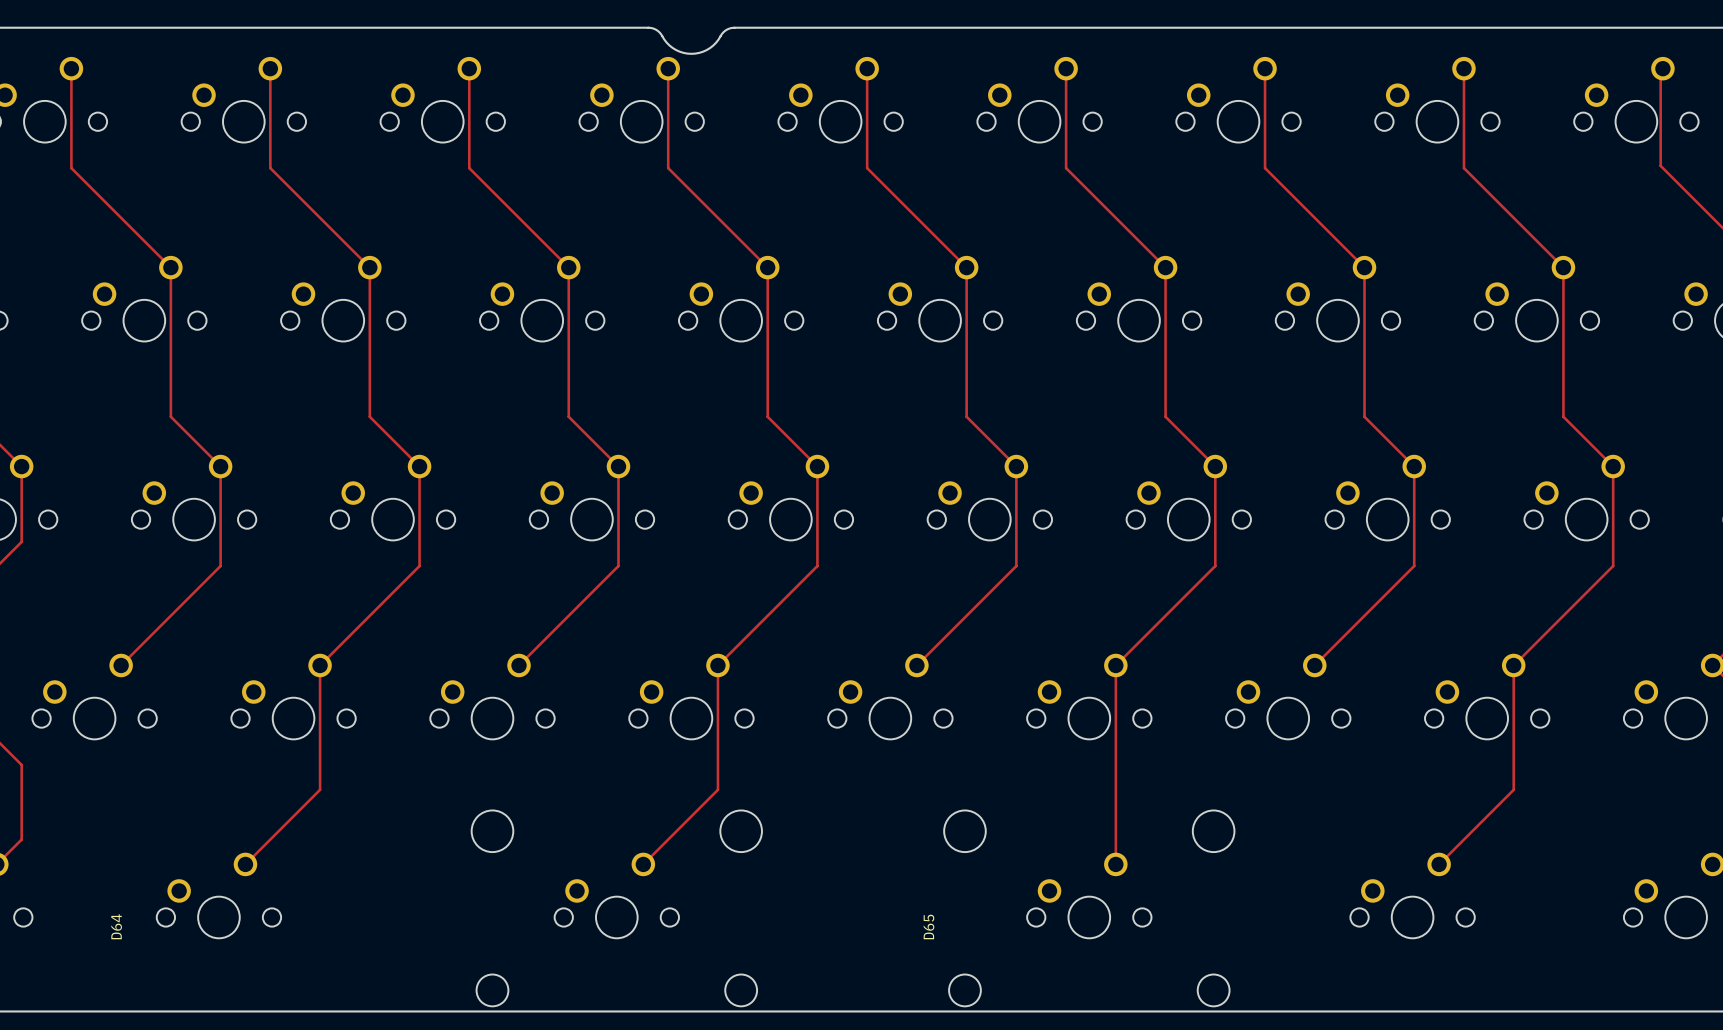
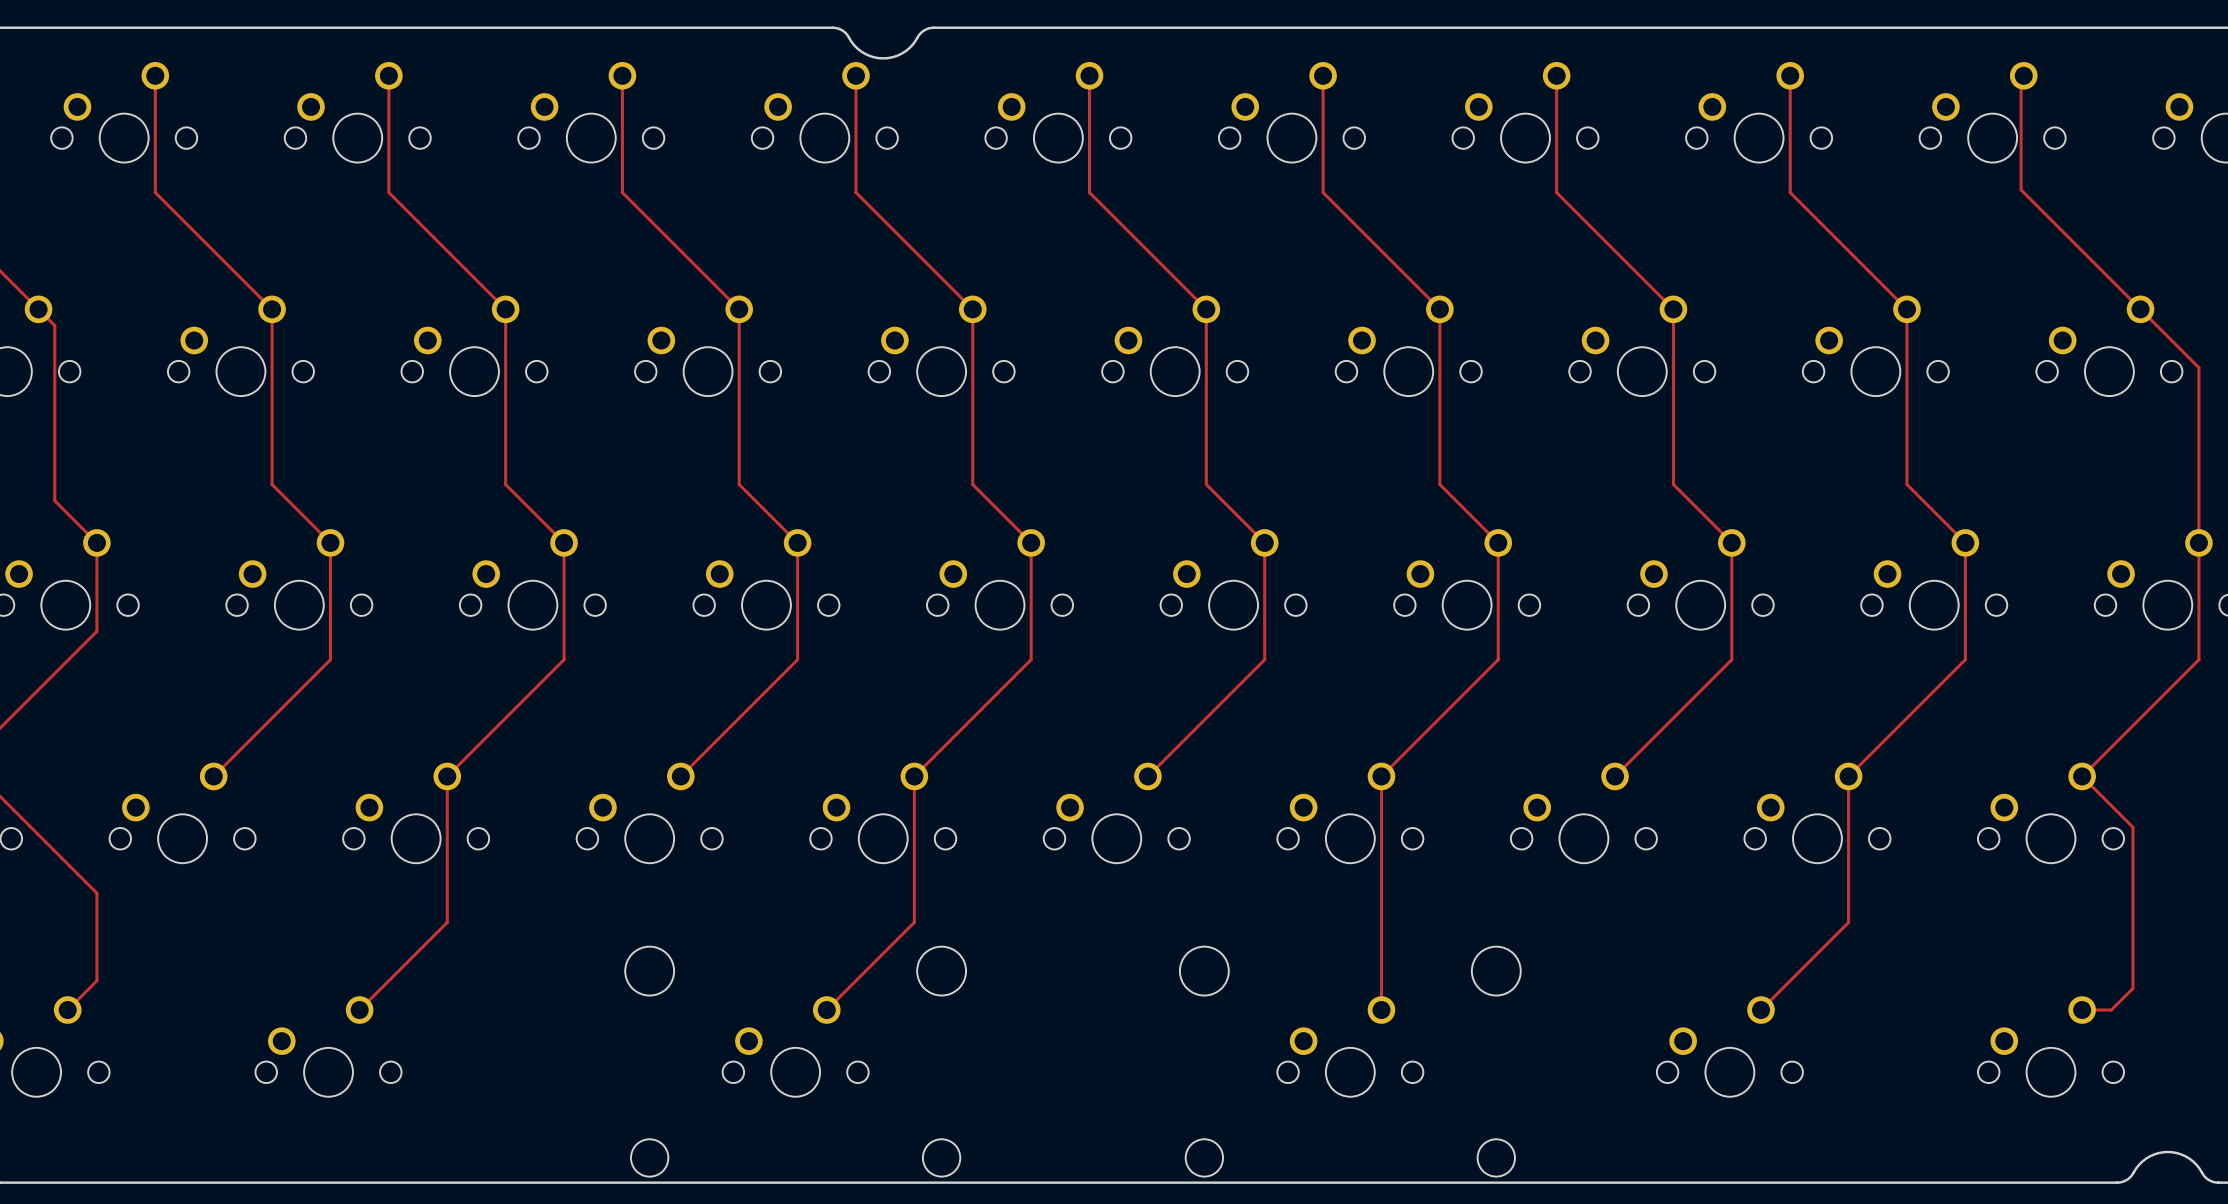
D64: (116, 926) -> none
D65: (928, 926) -> none

